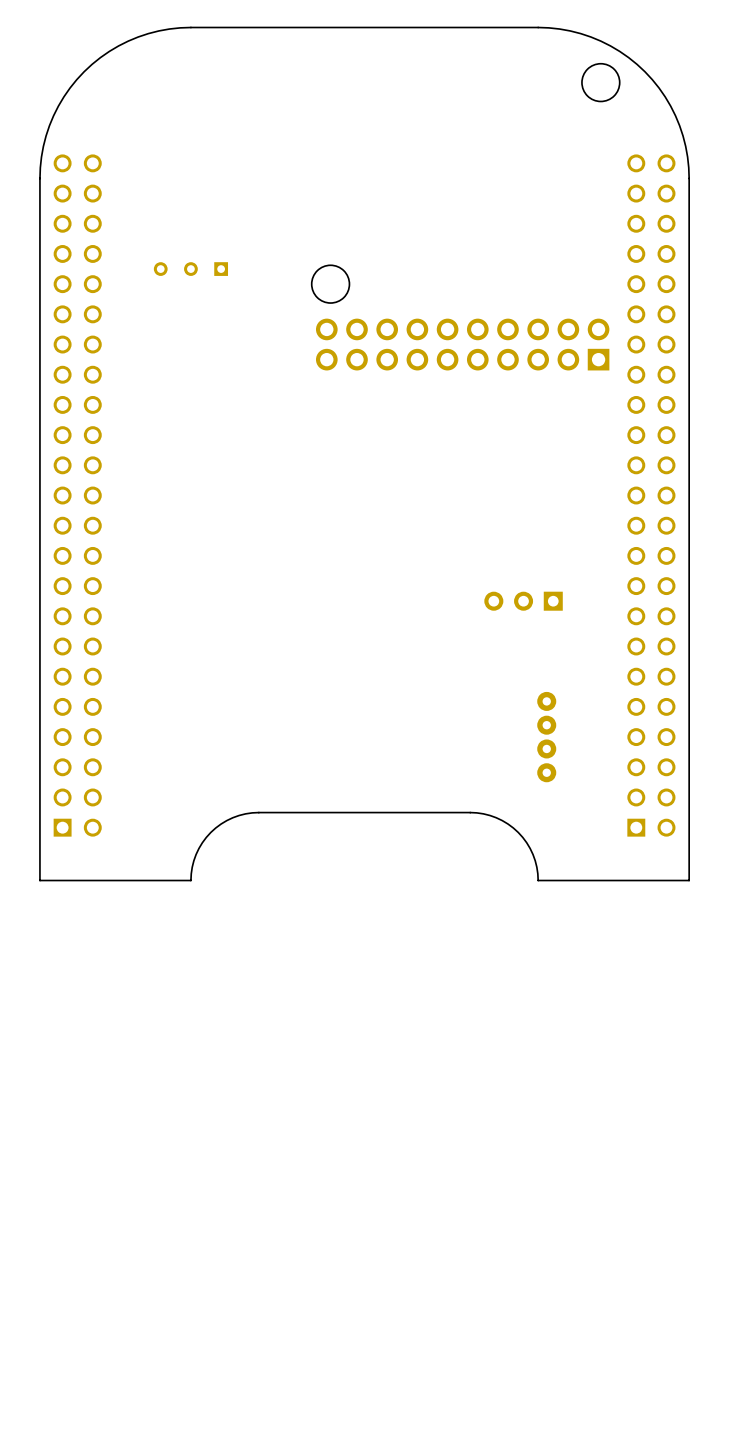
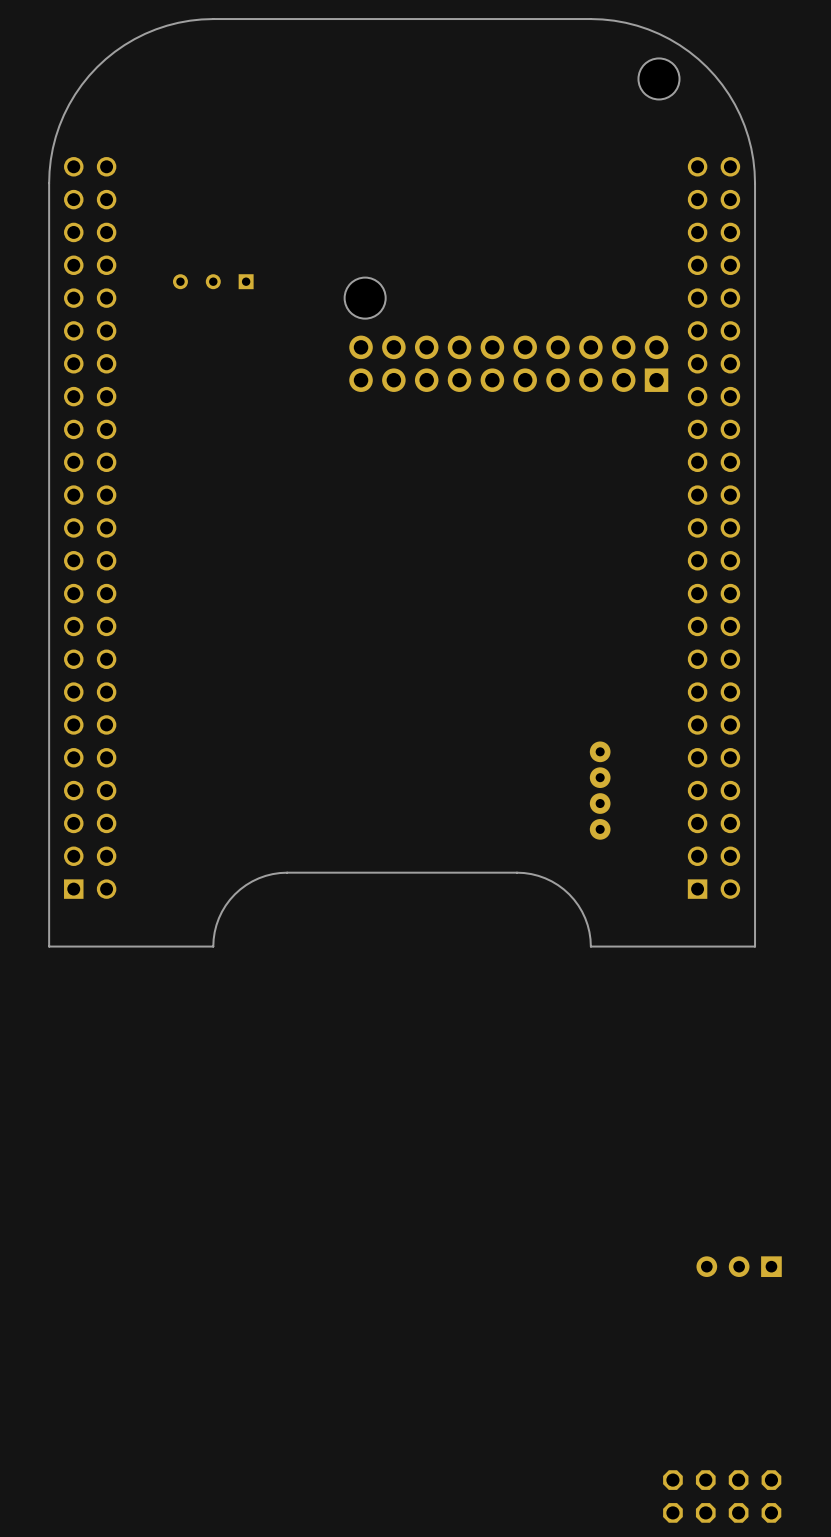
part: (523, 601) -> none
part: none -> (739, 1266)
part: none -> (722, 1496)

